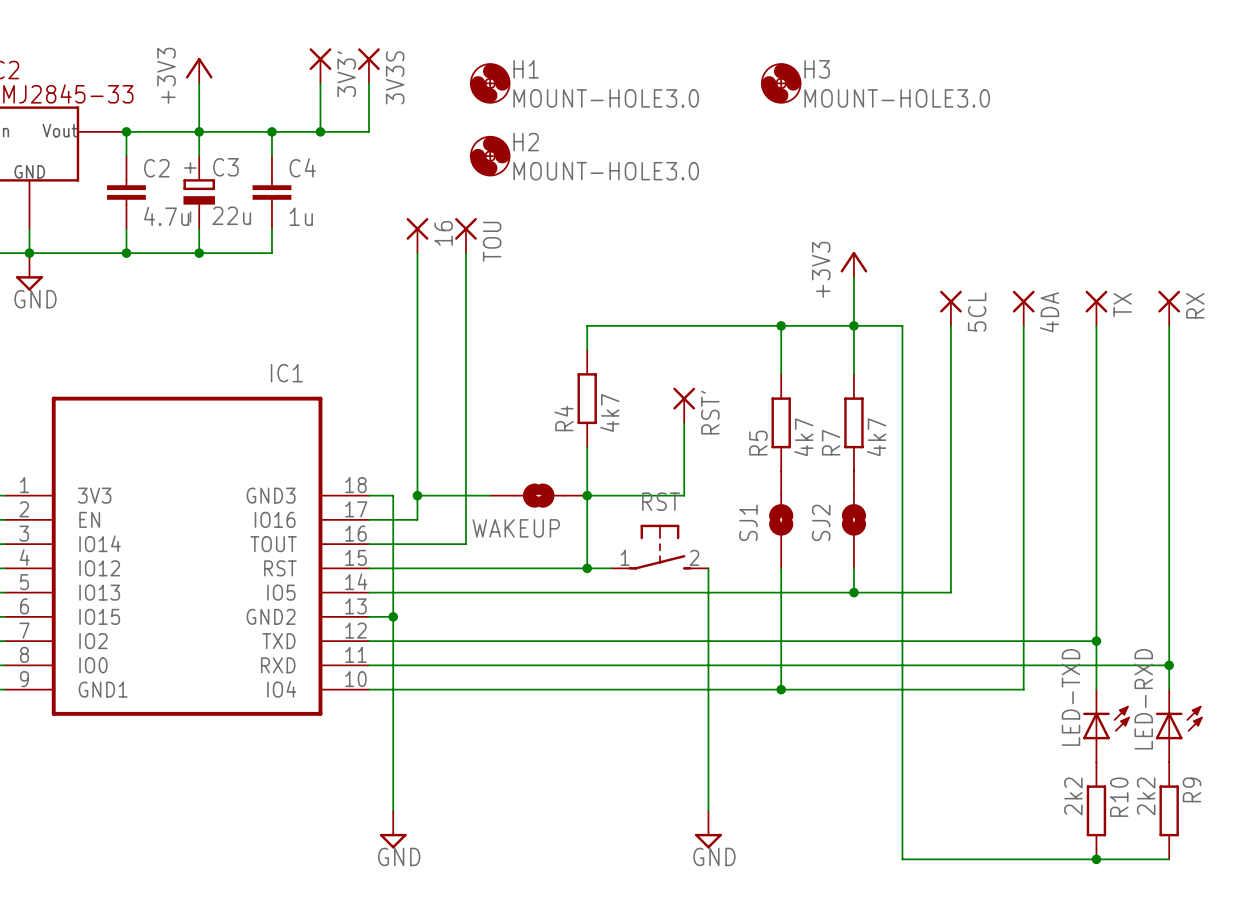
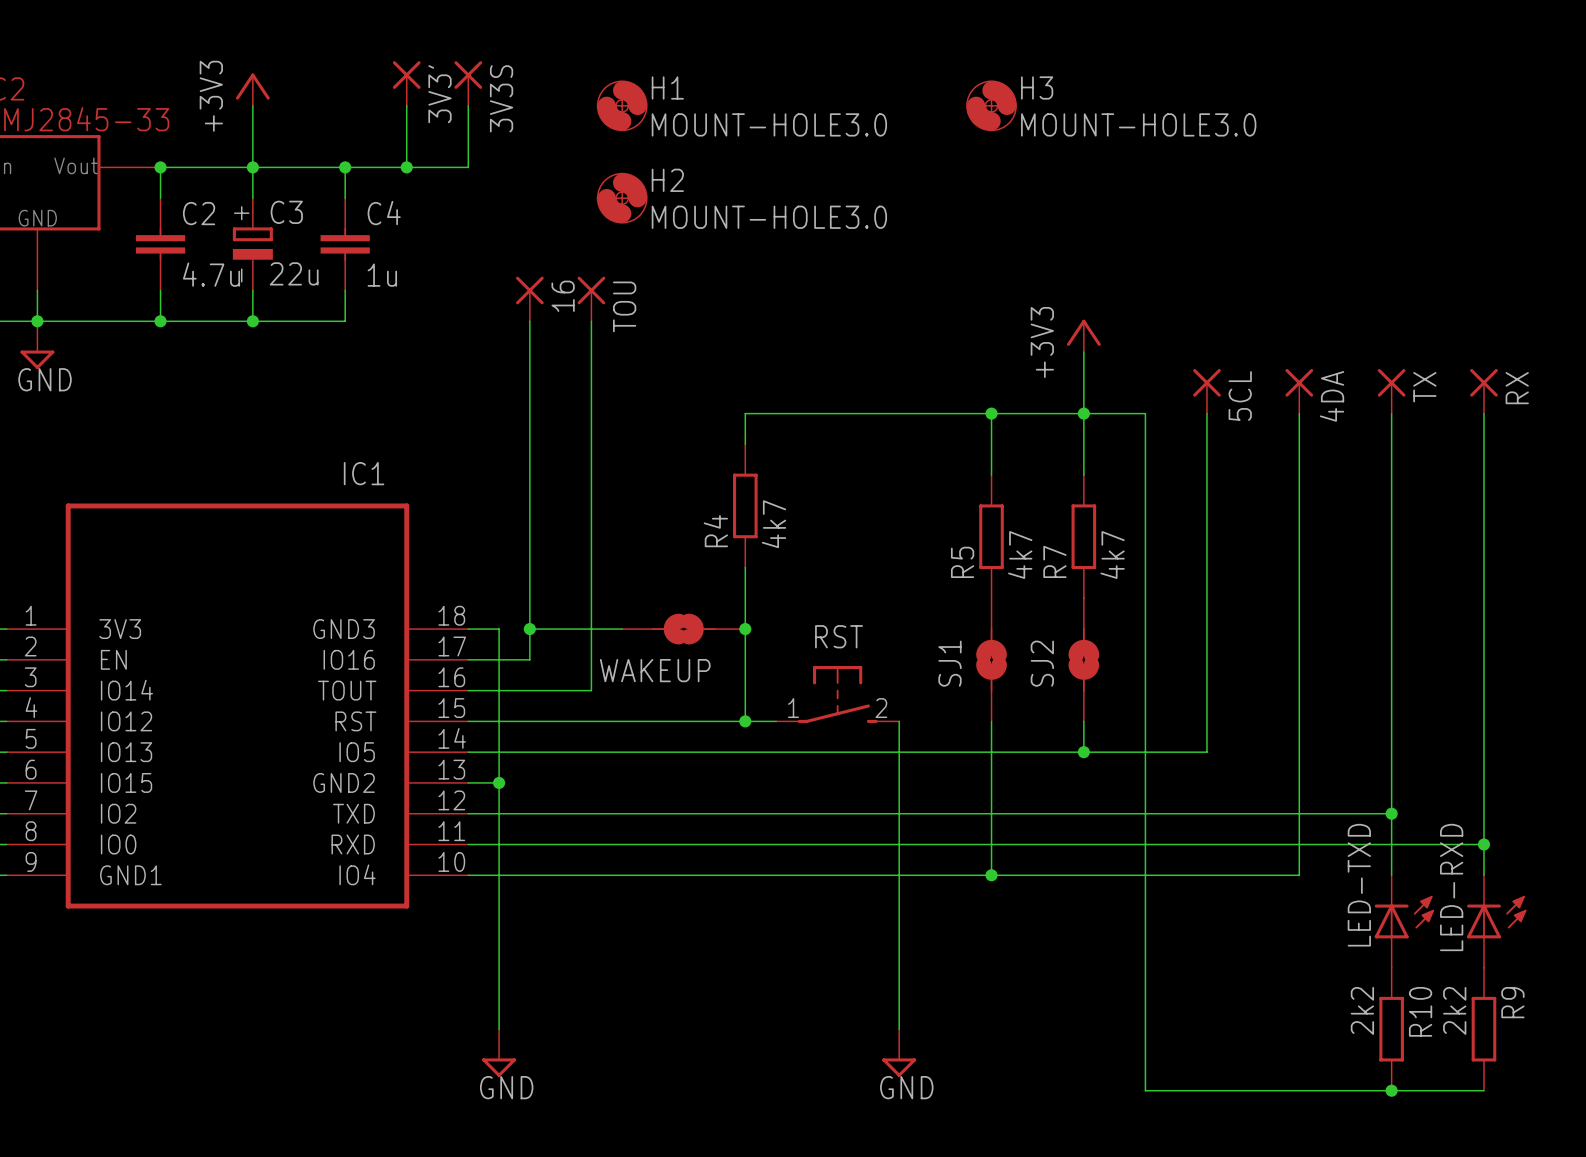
RST': (684, 405) -> none
wire: (684, 422) (684, 495) (587, 495) -> none

